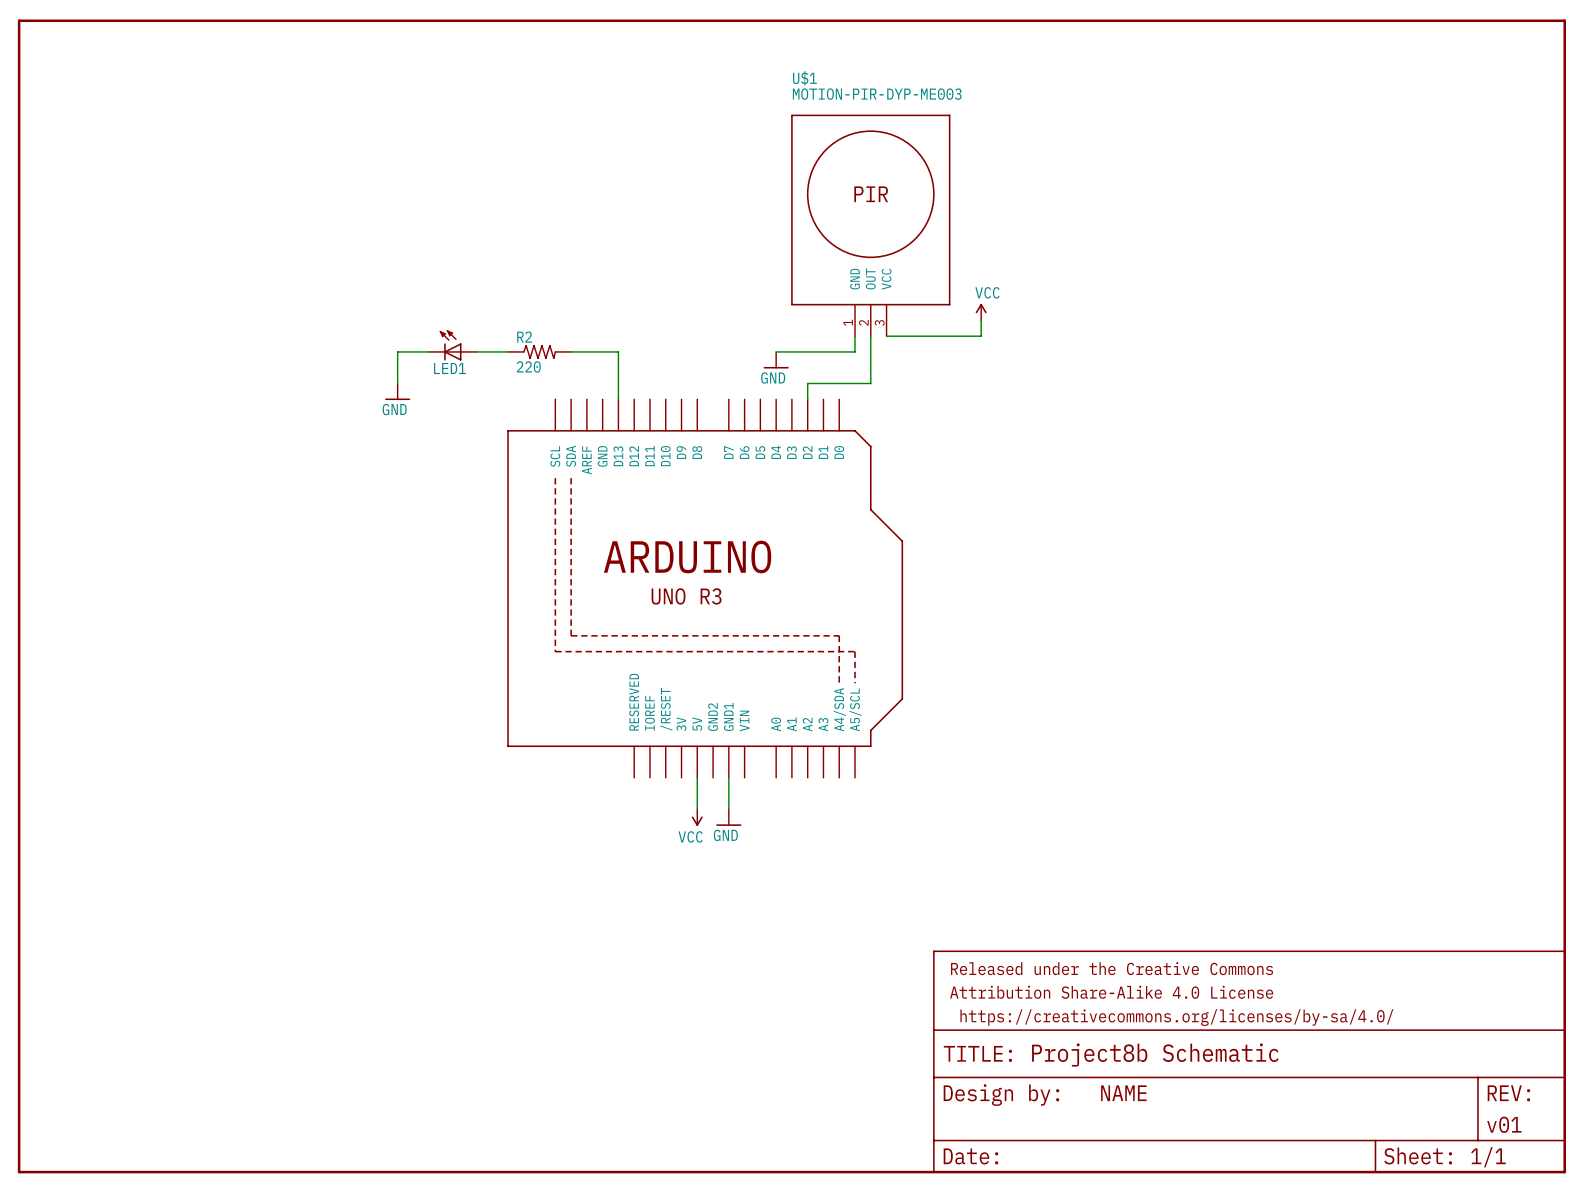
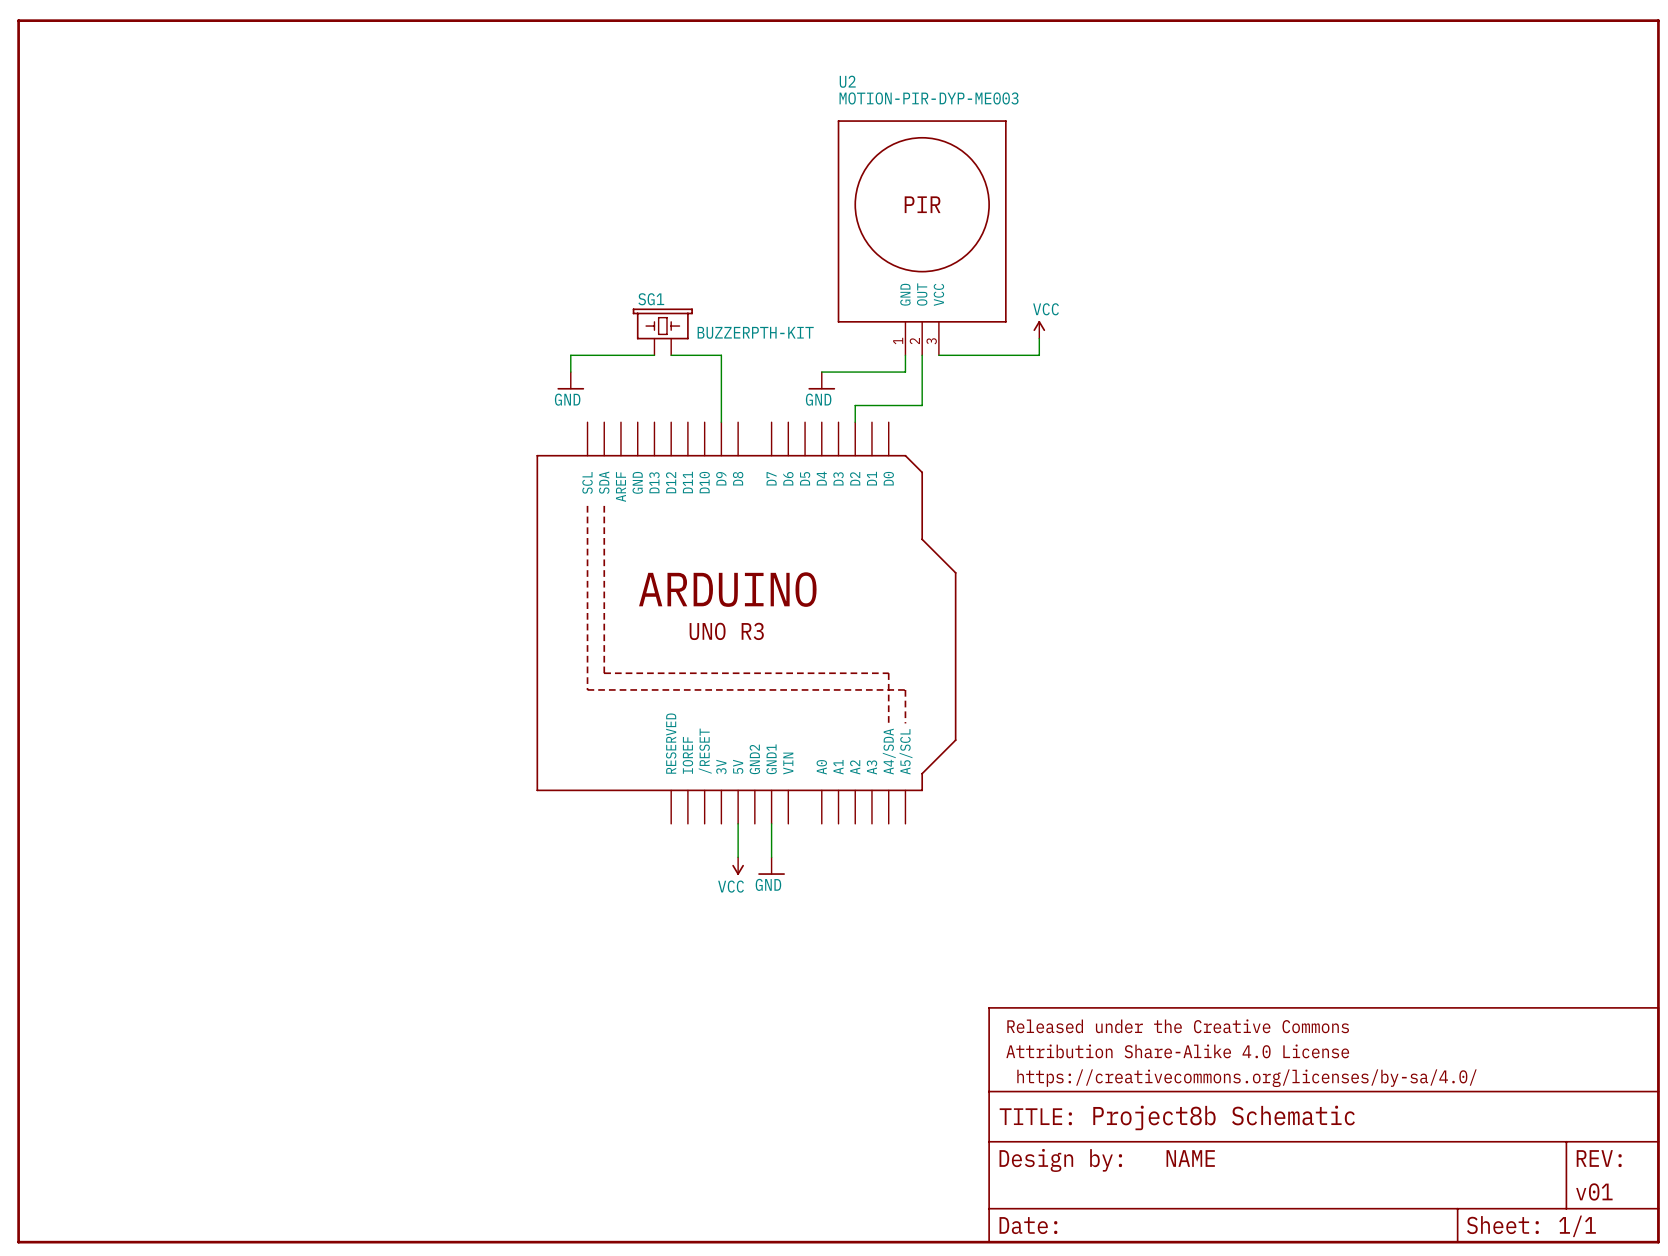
U$1 name: U$1 (804, 78) -> U2 (847, 81)
SG1: none -> BUZZERPTH-KIT (662, 331)
wire: none -> (654, 355) (570, 355) (570, 372)
wire: none -> (671, 355) (721, 355) (721, 422)
LED1: (452, 345) -> none
wire: (429, 351) (397, 351) (397, 383) -> none
wire: (476, 351) (508, 351) -> none
R2: 220 (539, 351) -> none
wire: (571, 351) (618, 351) (618, 399) -> none
power symbol position: GND (397, 391) -> GND (570, 380)

